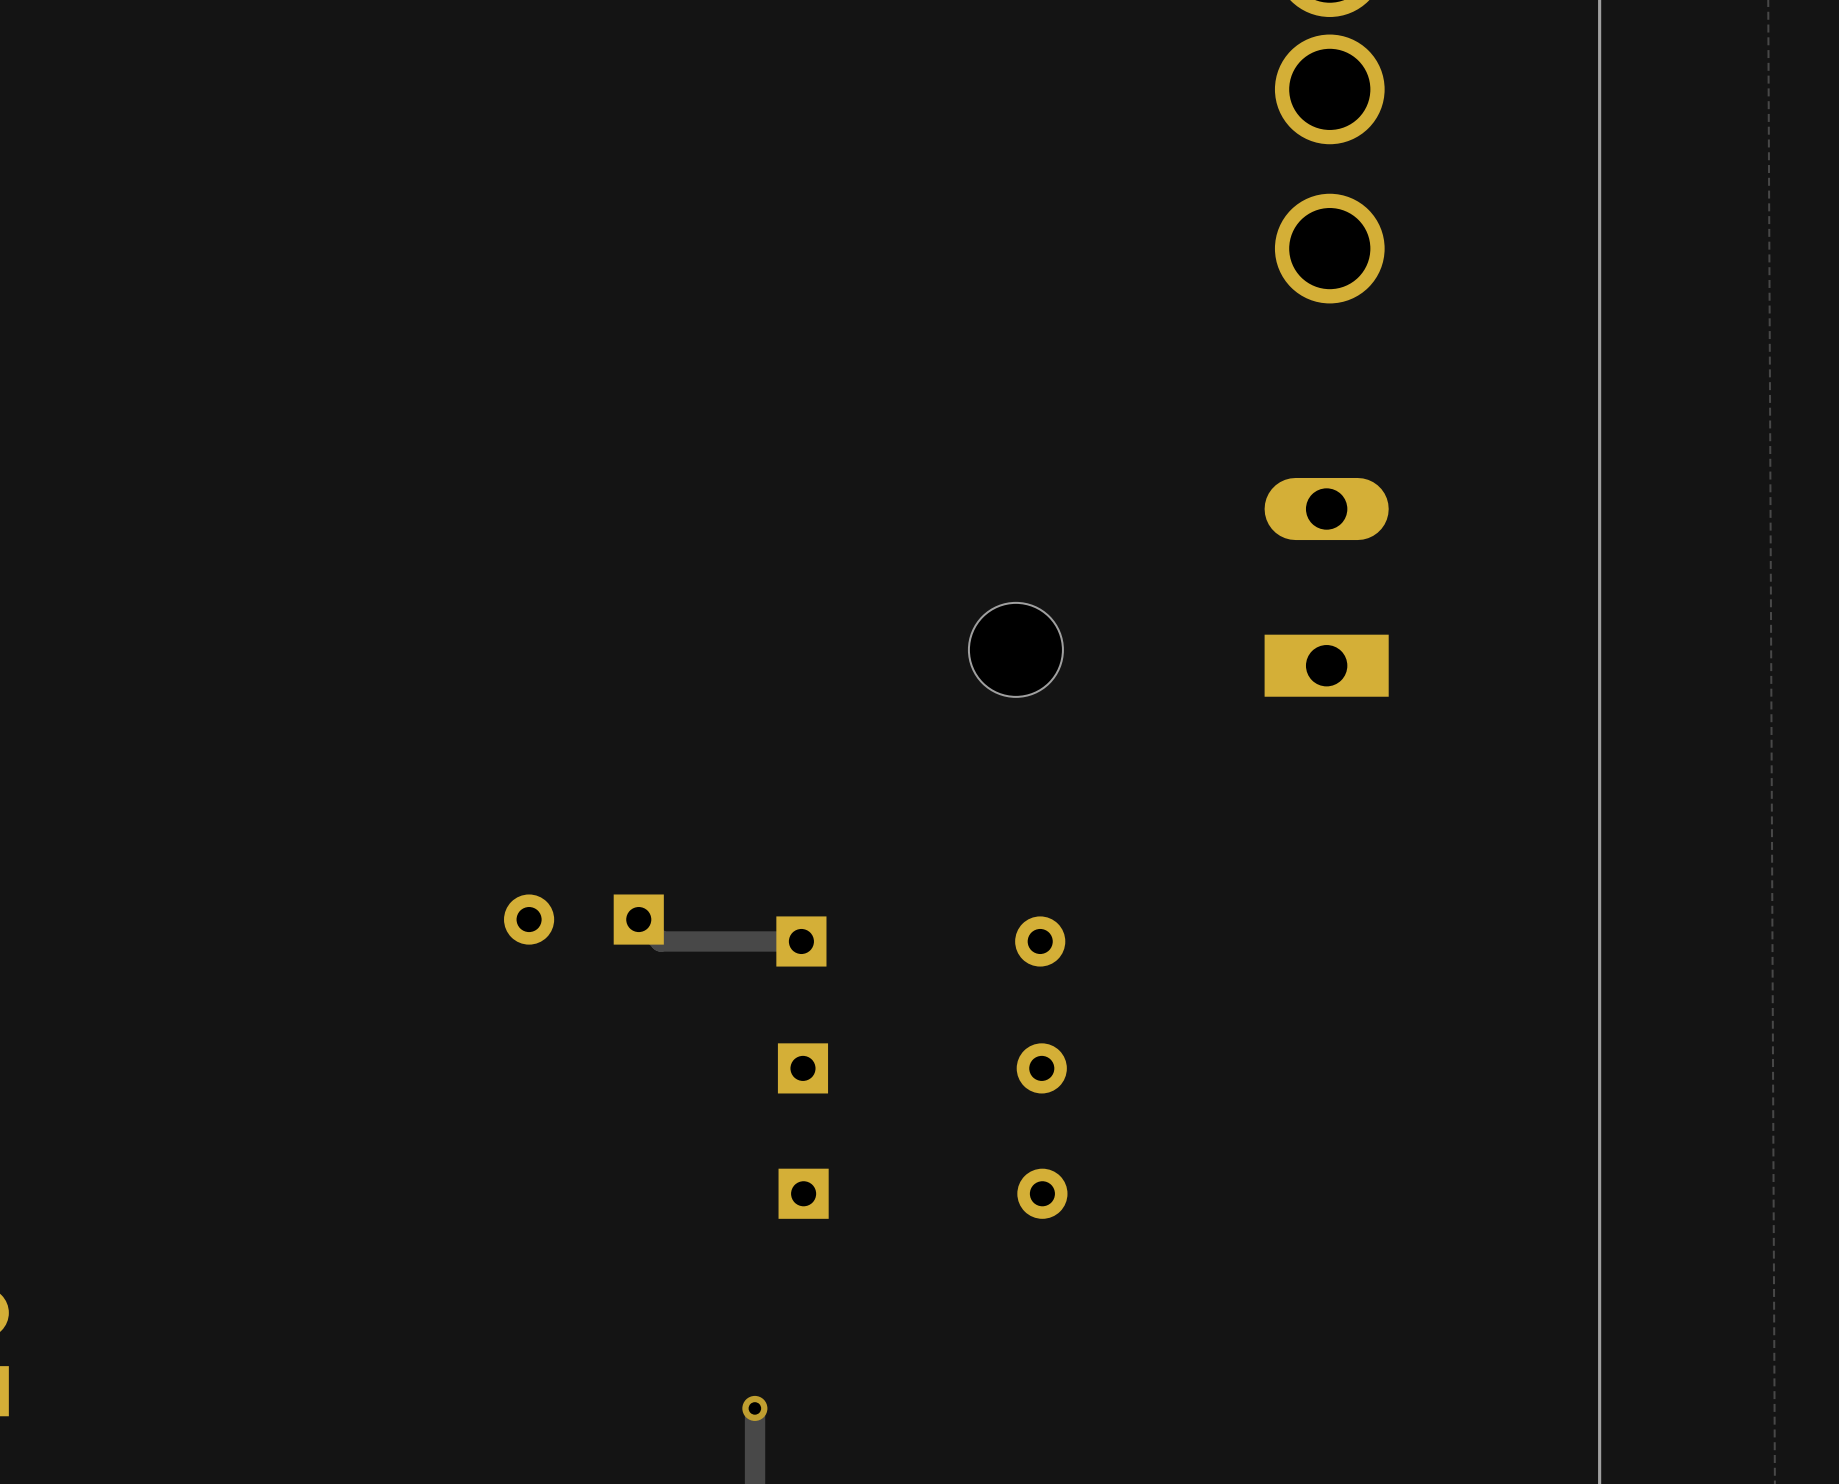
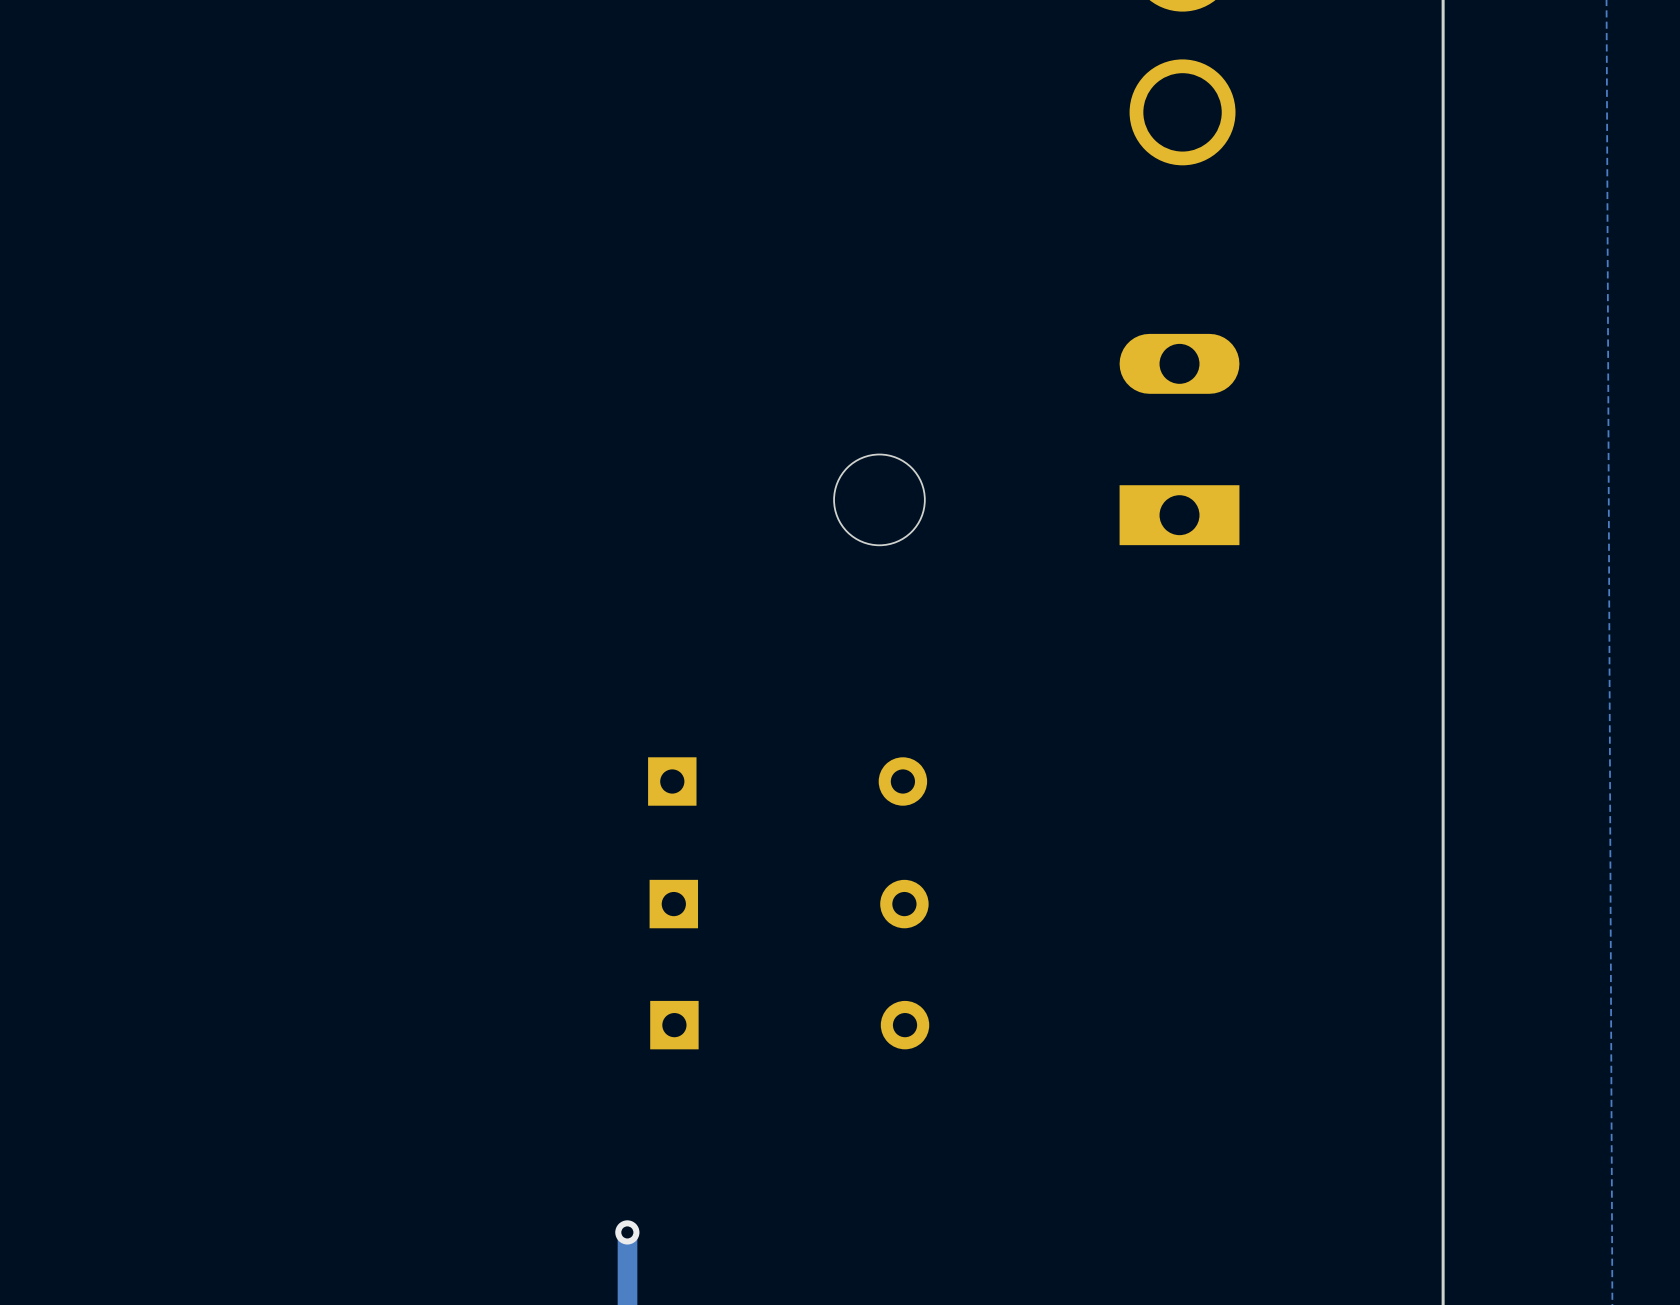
part: (583, 919) -> none
track: (638, 919) (660, 941) (801, 941) -> none

